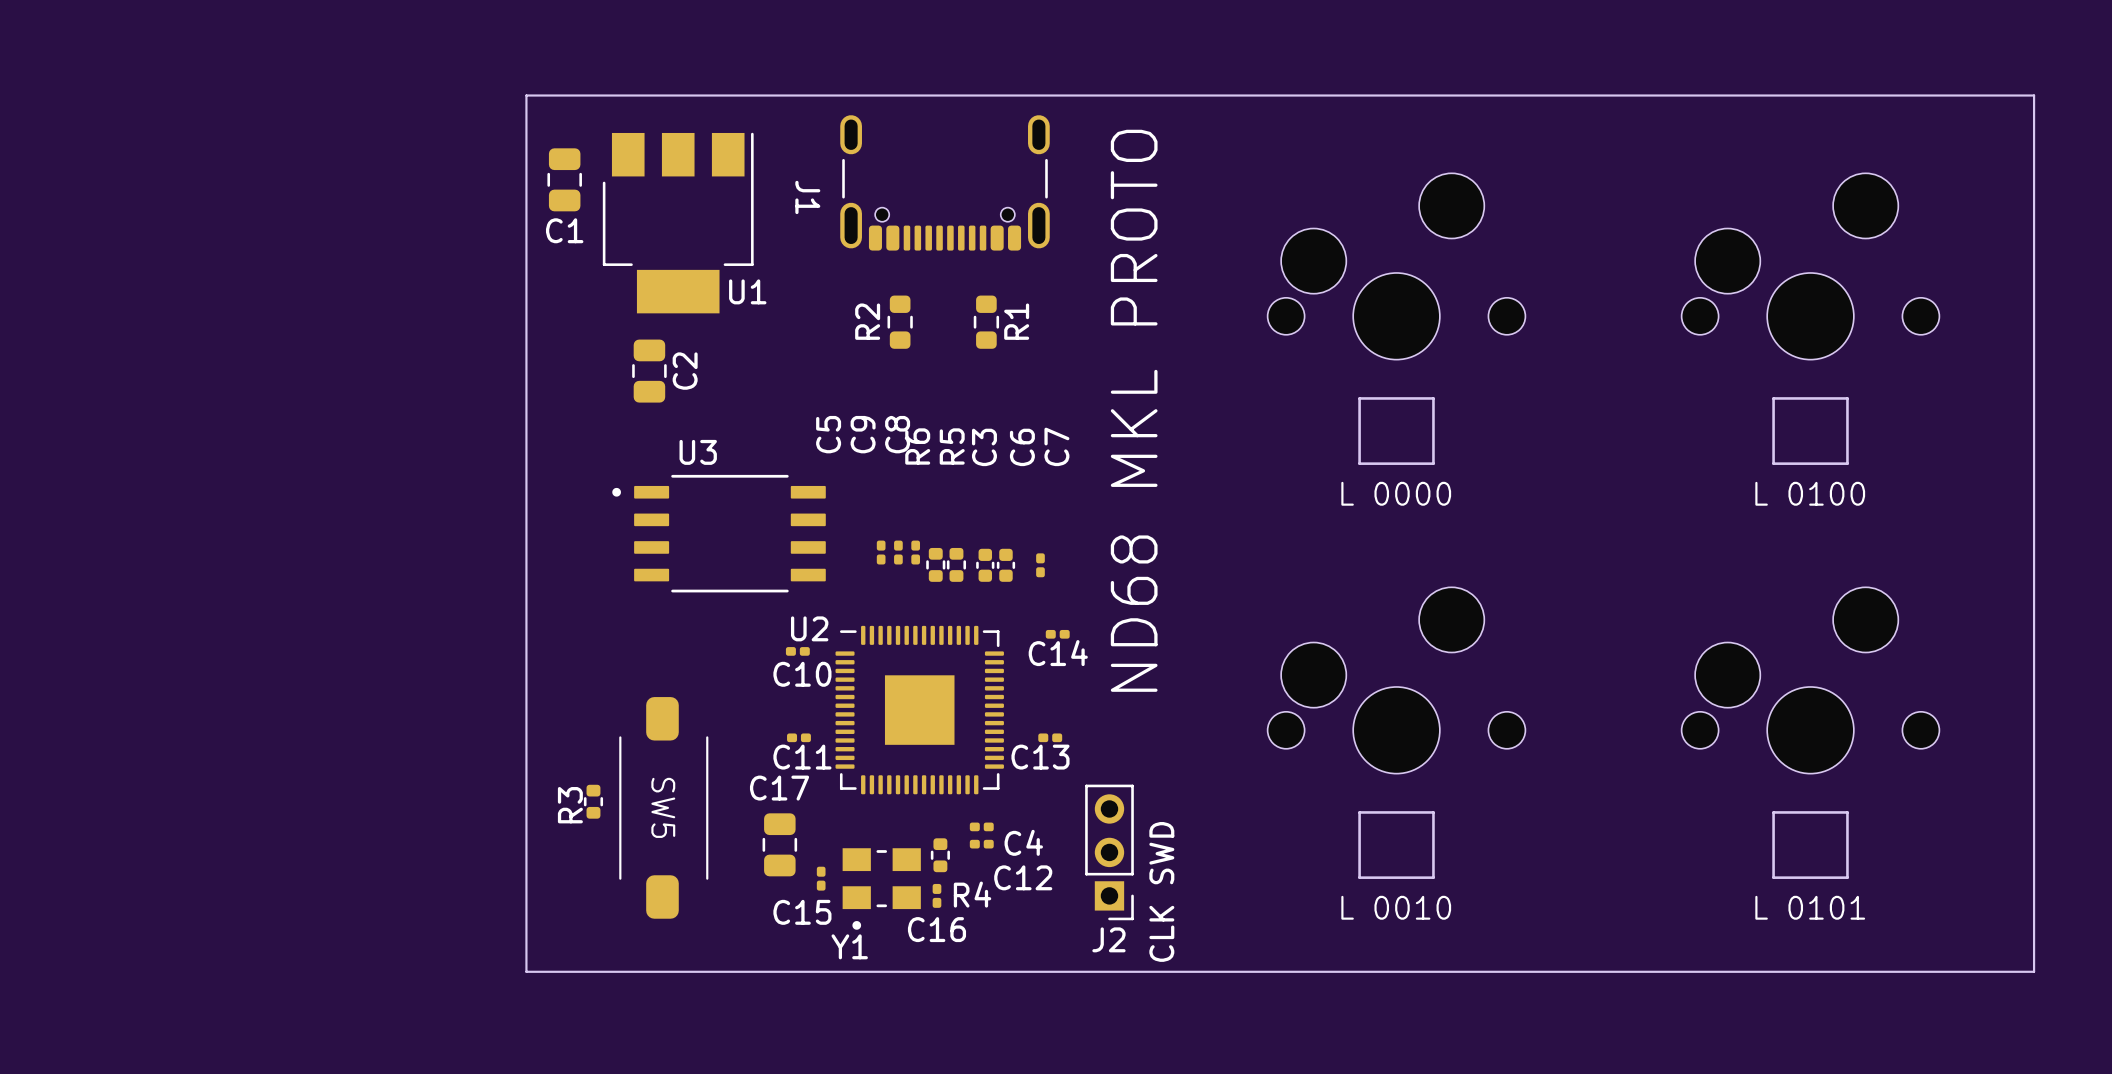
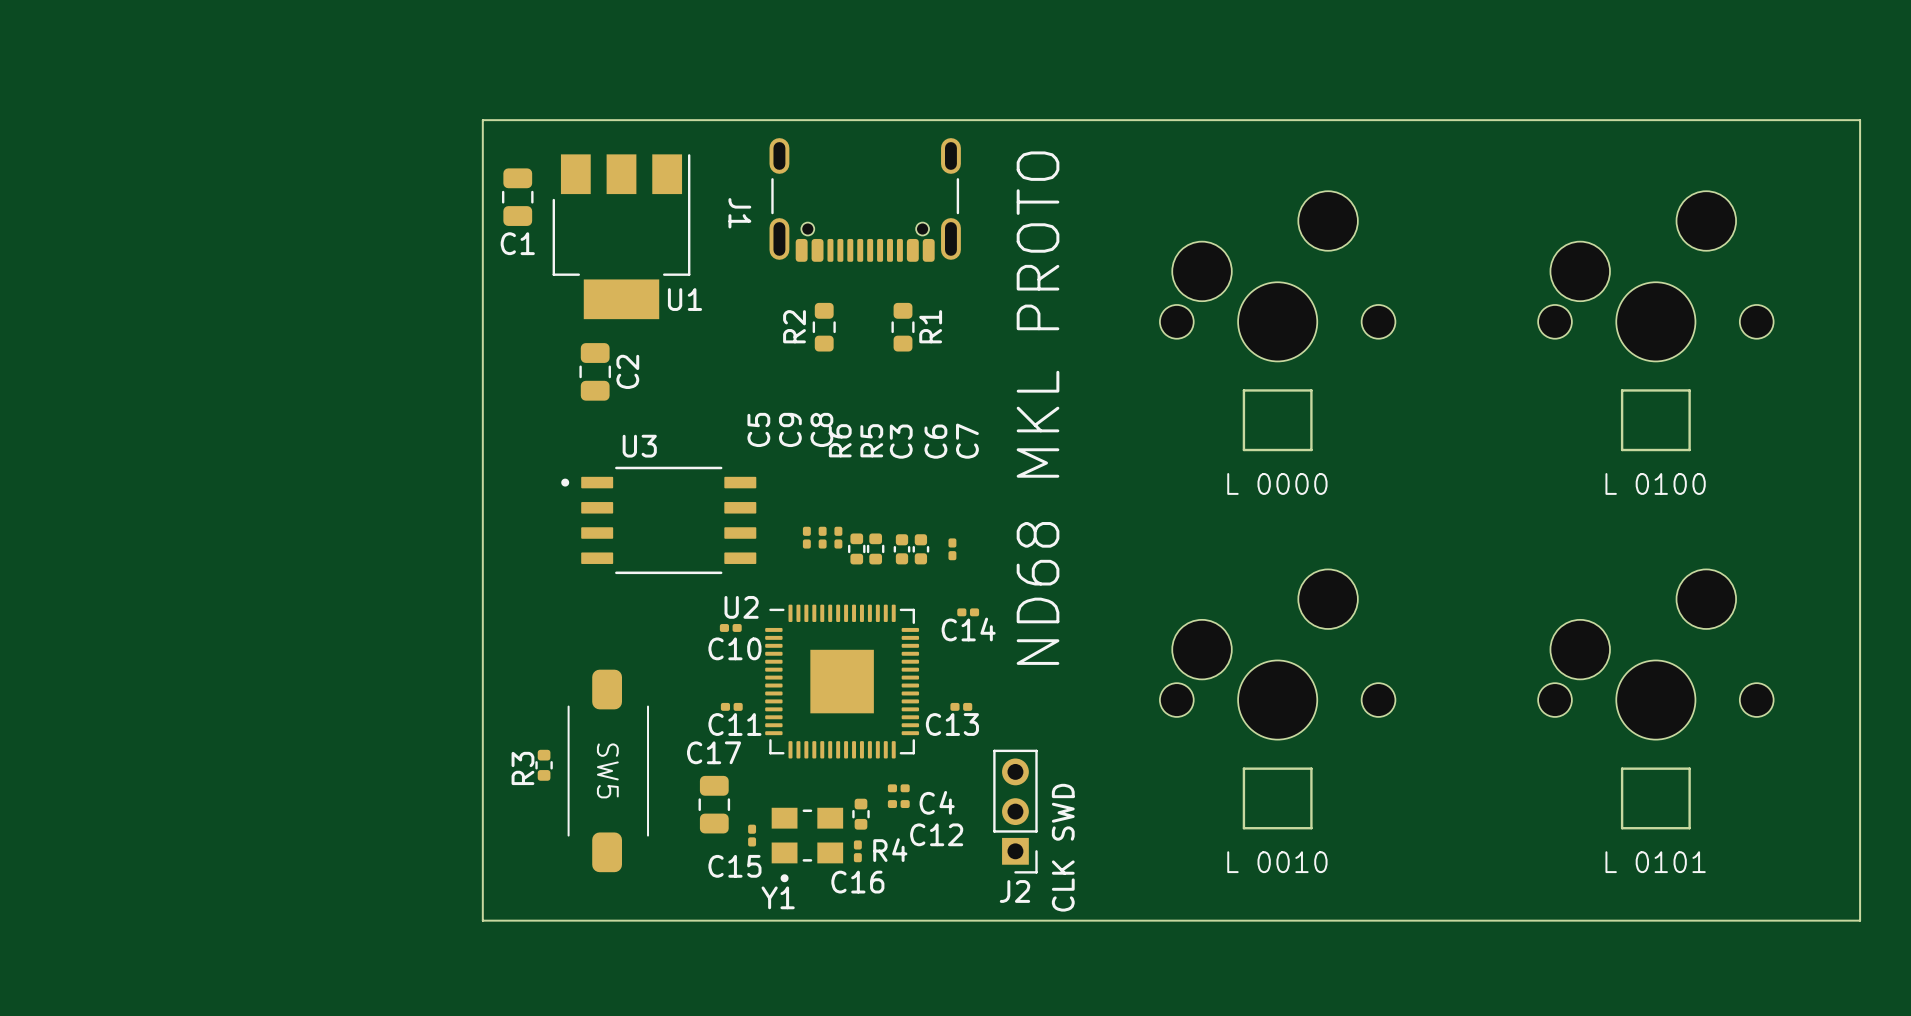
part footprint: [1267, 173, 1526, 465] -> [1159, 191, 1396, 452]
part footprint: [1681, 173, 1940, 465] -> [1538, 191, 1774, 452]
part footprint: [1267, 587, 1526, 879] -> [1159, 569, 1396, 830]
part footprint: [1681, 587, 1940, 879] -> [1538, 569, 1774, 830]

